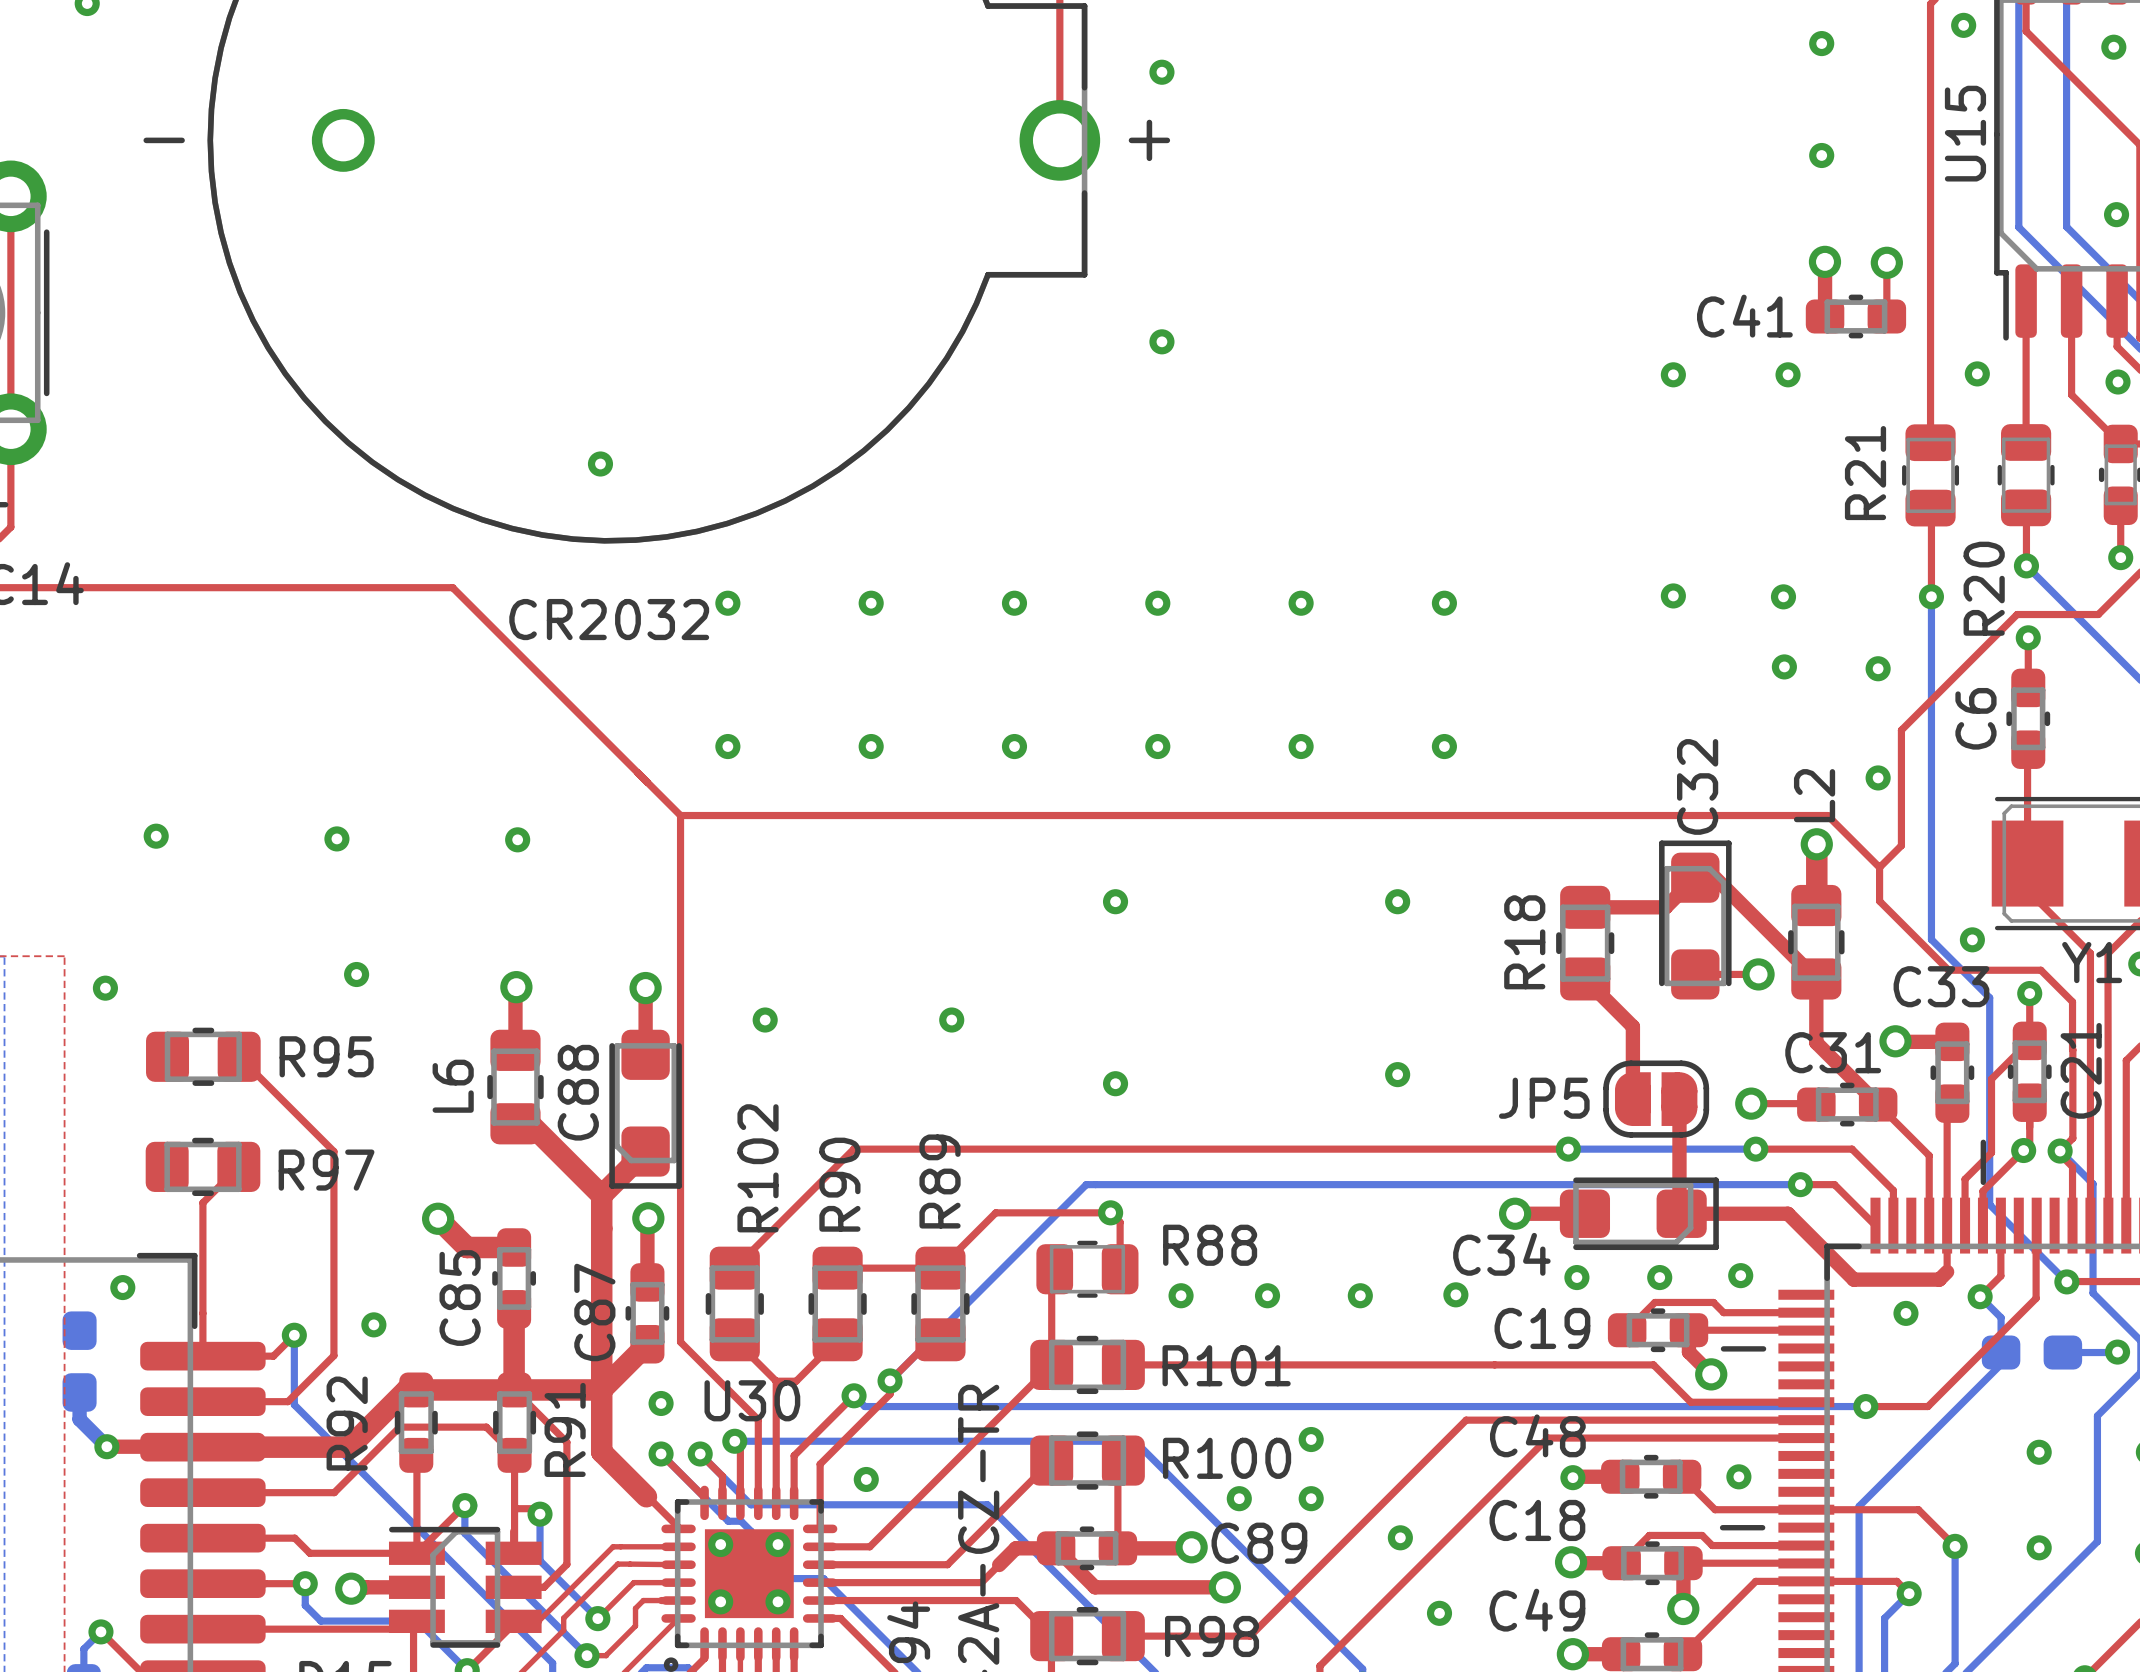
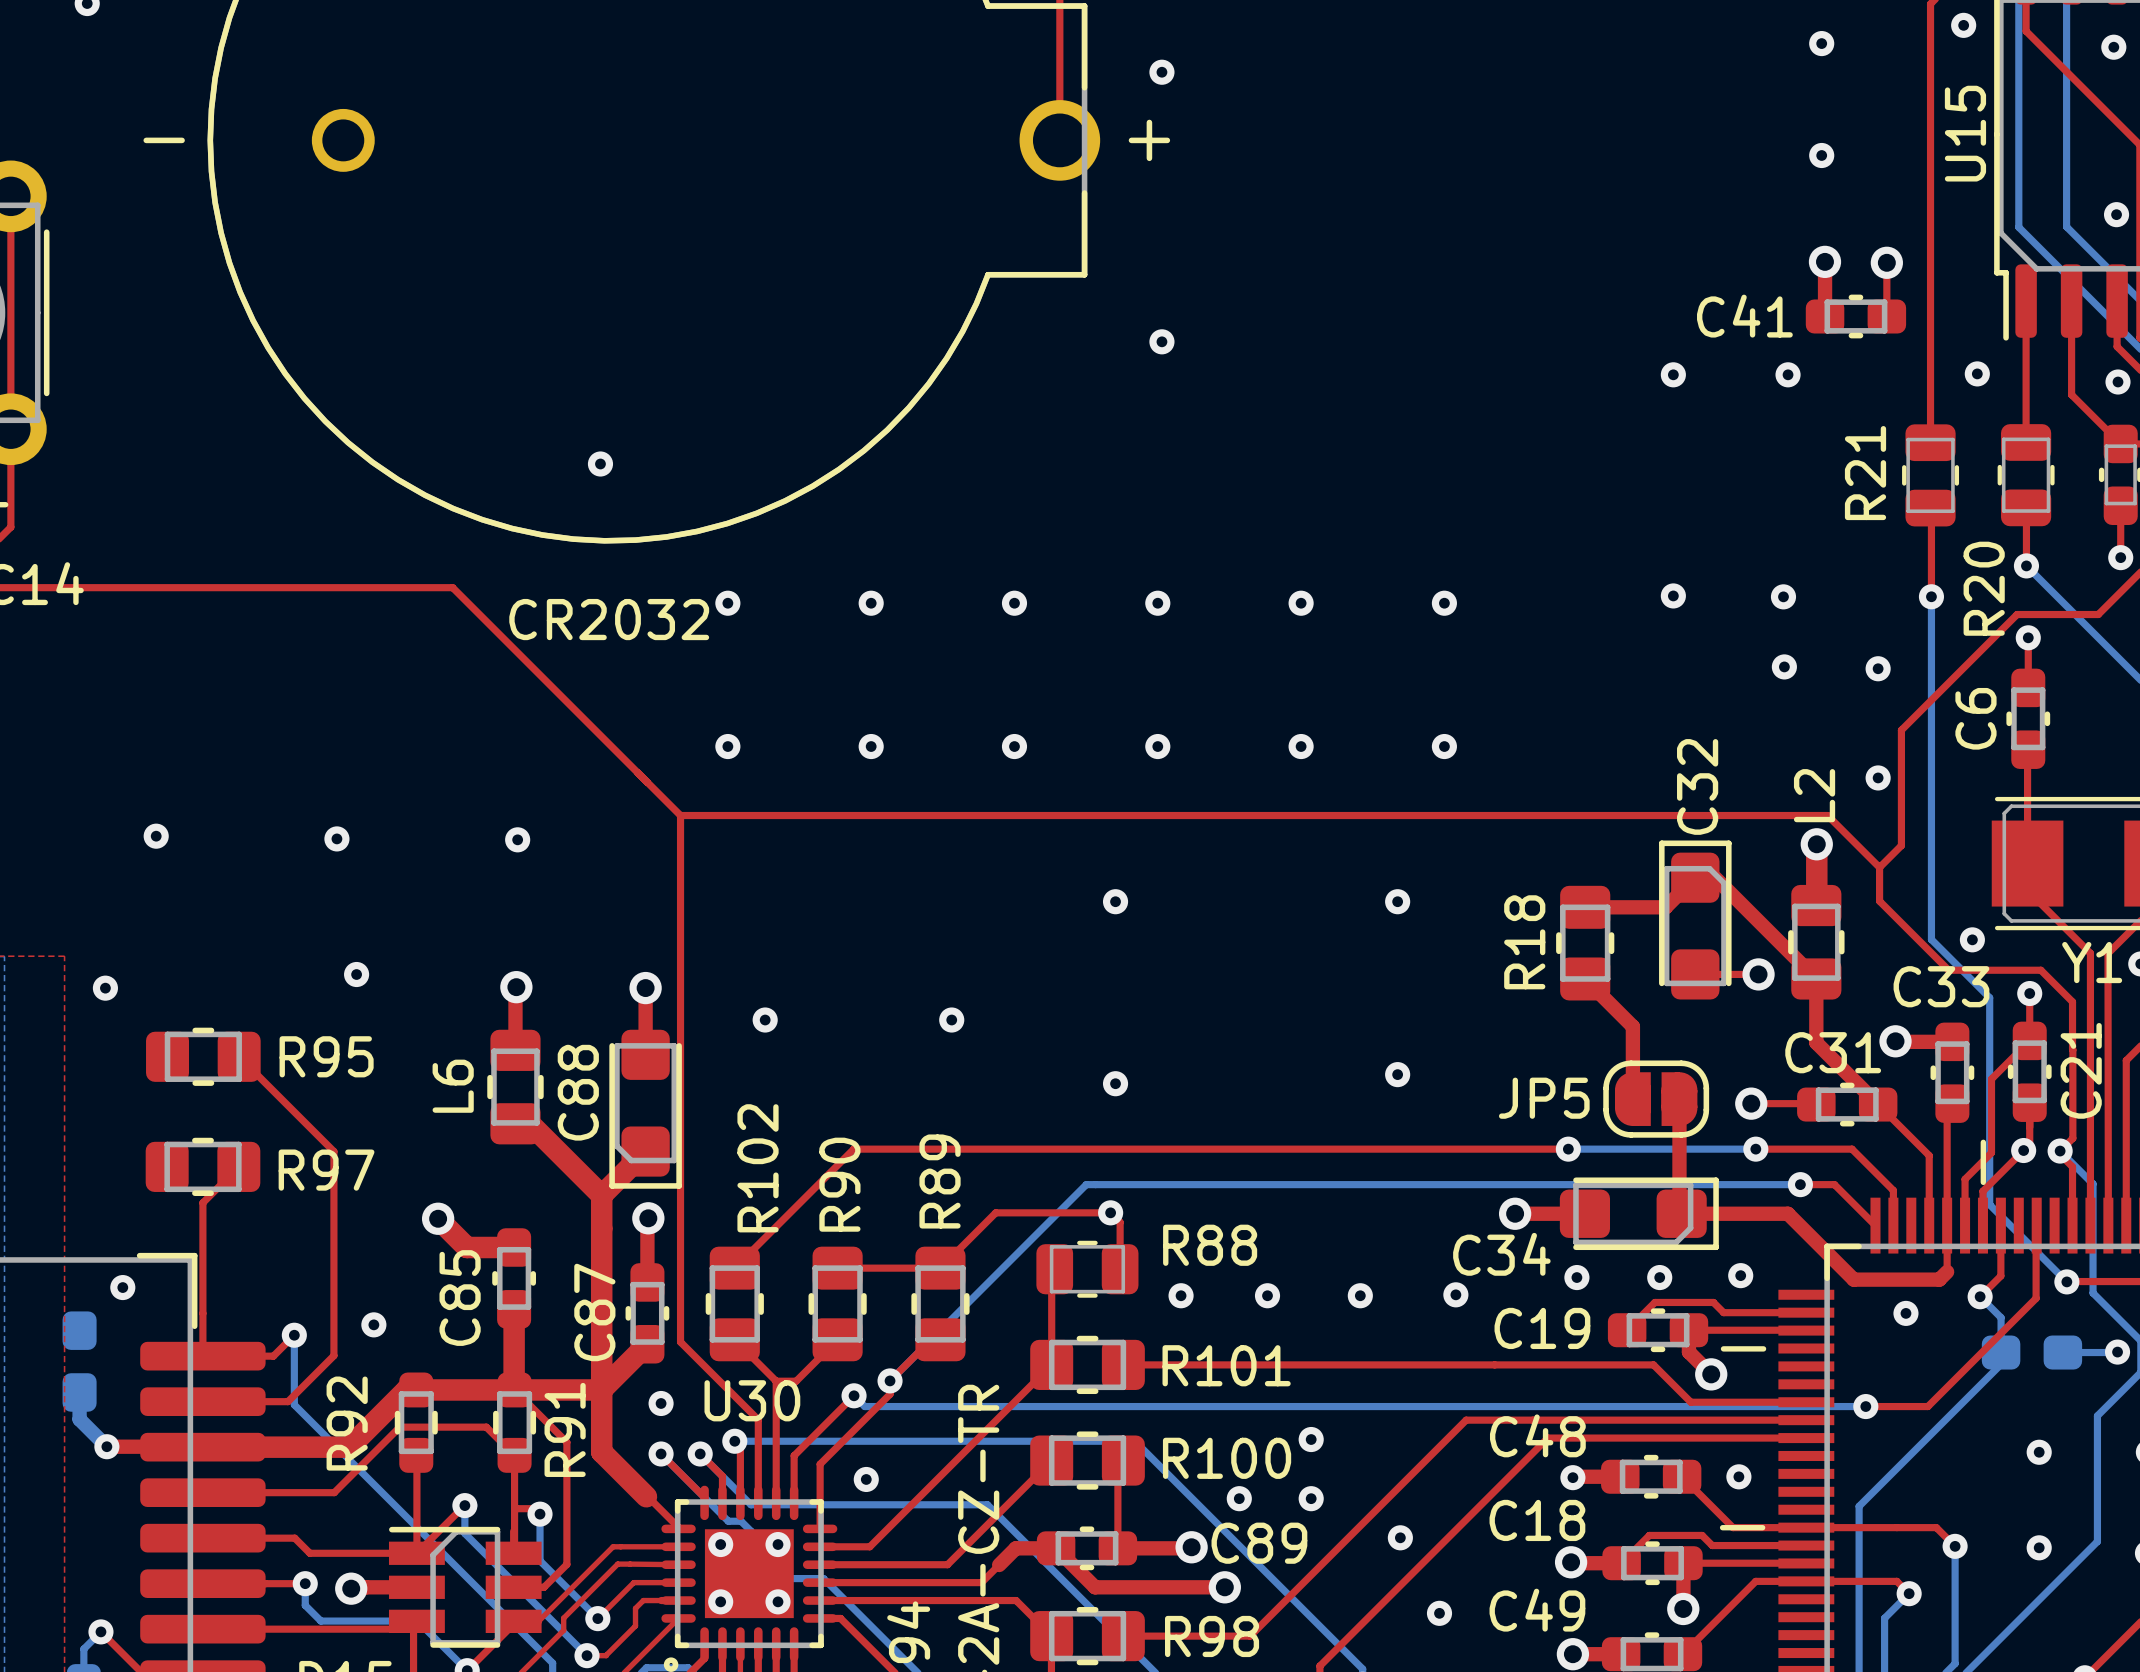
top track: (1715, 1509) (1918, 1509) (1936, 1527) -> (1715, 1509) (1733, 1527) (1936, 1527)

